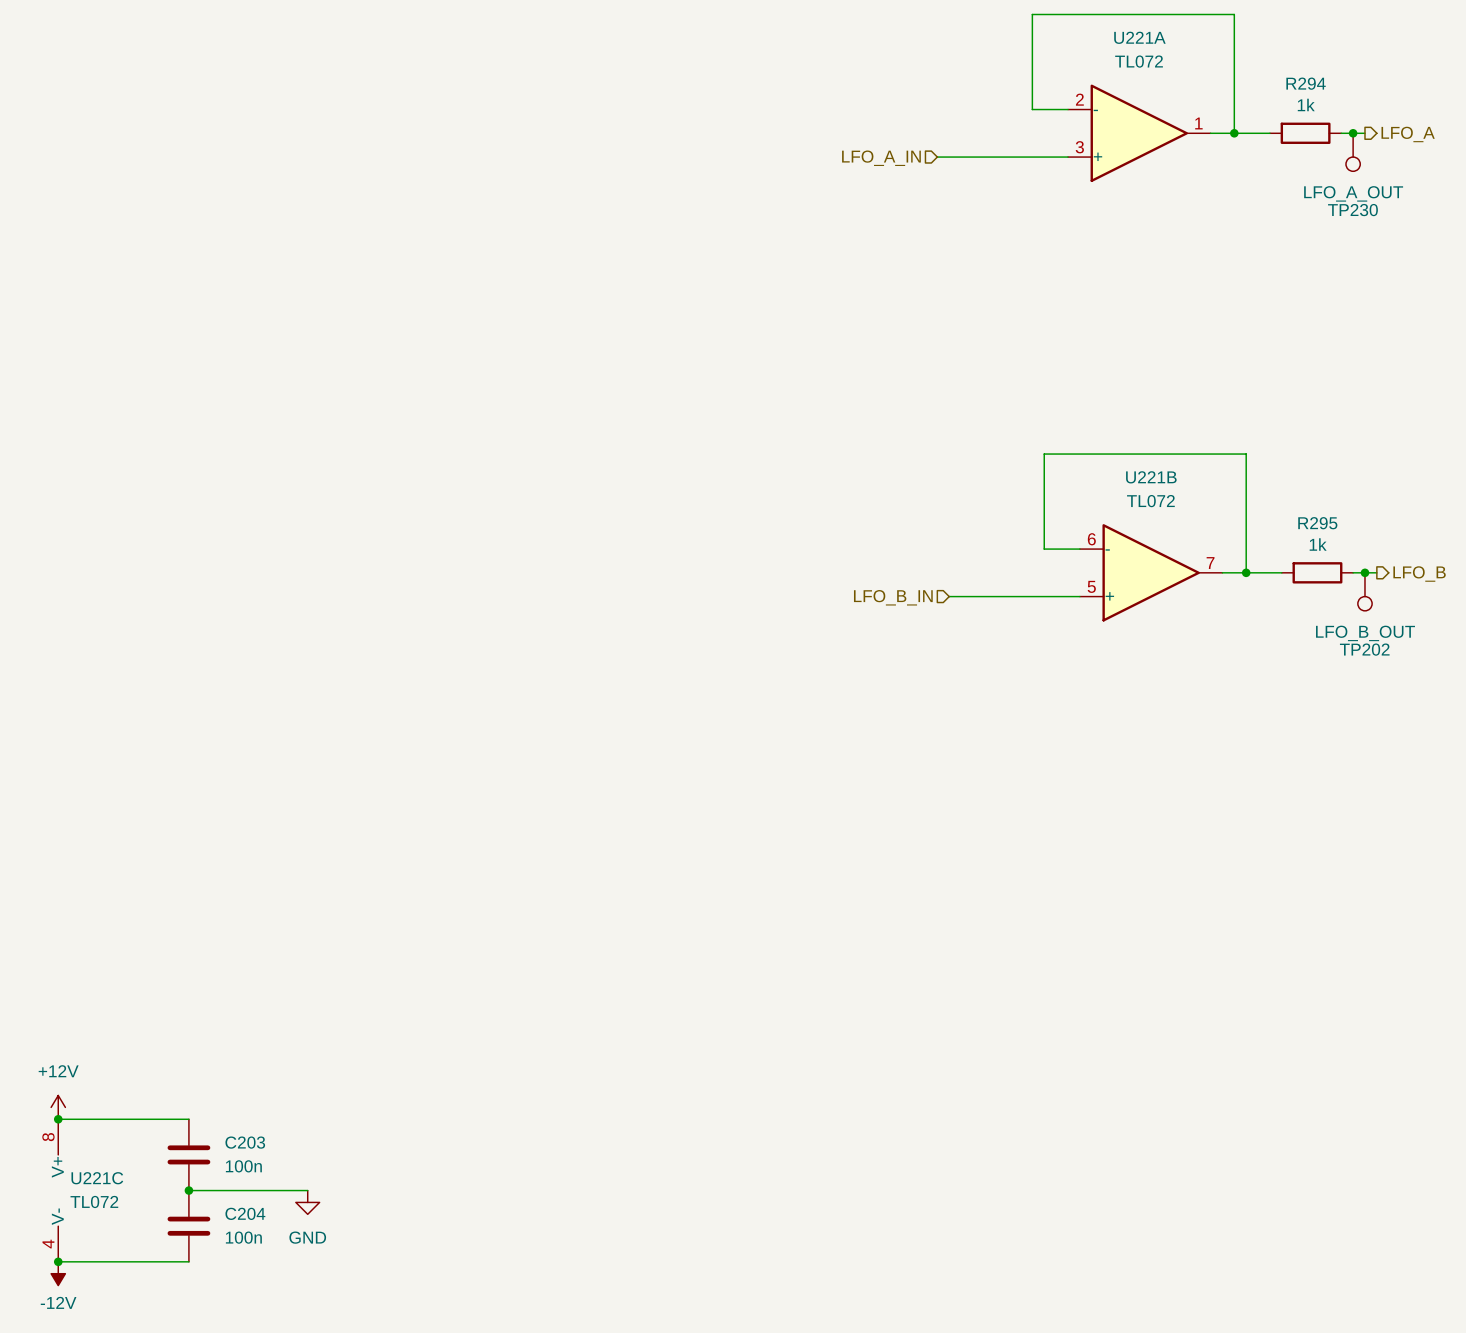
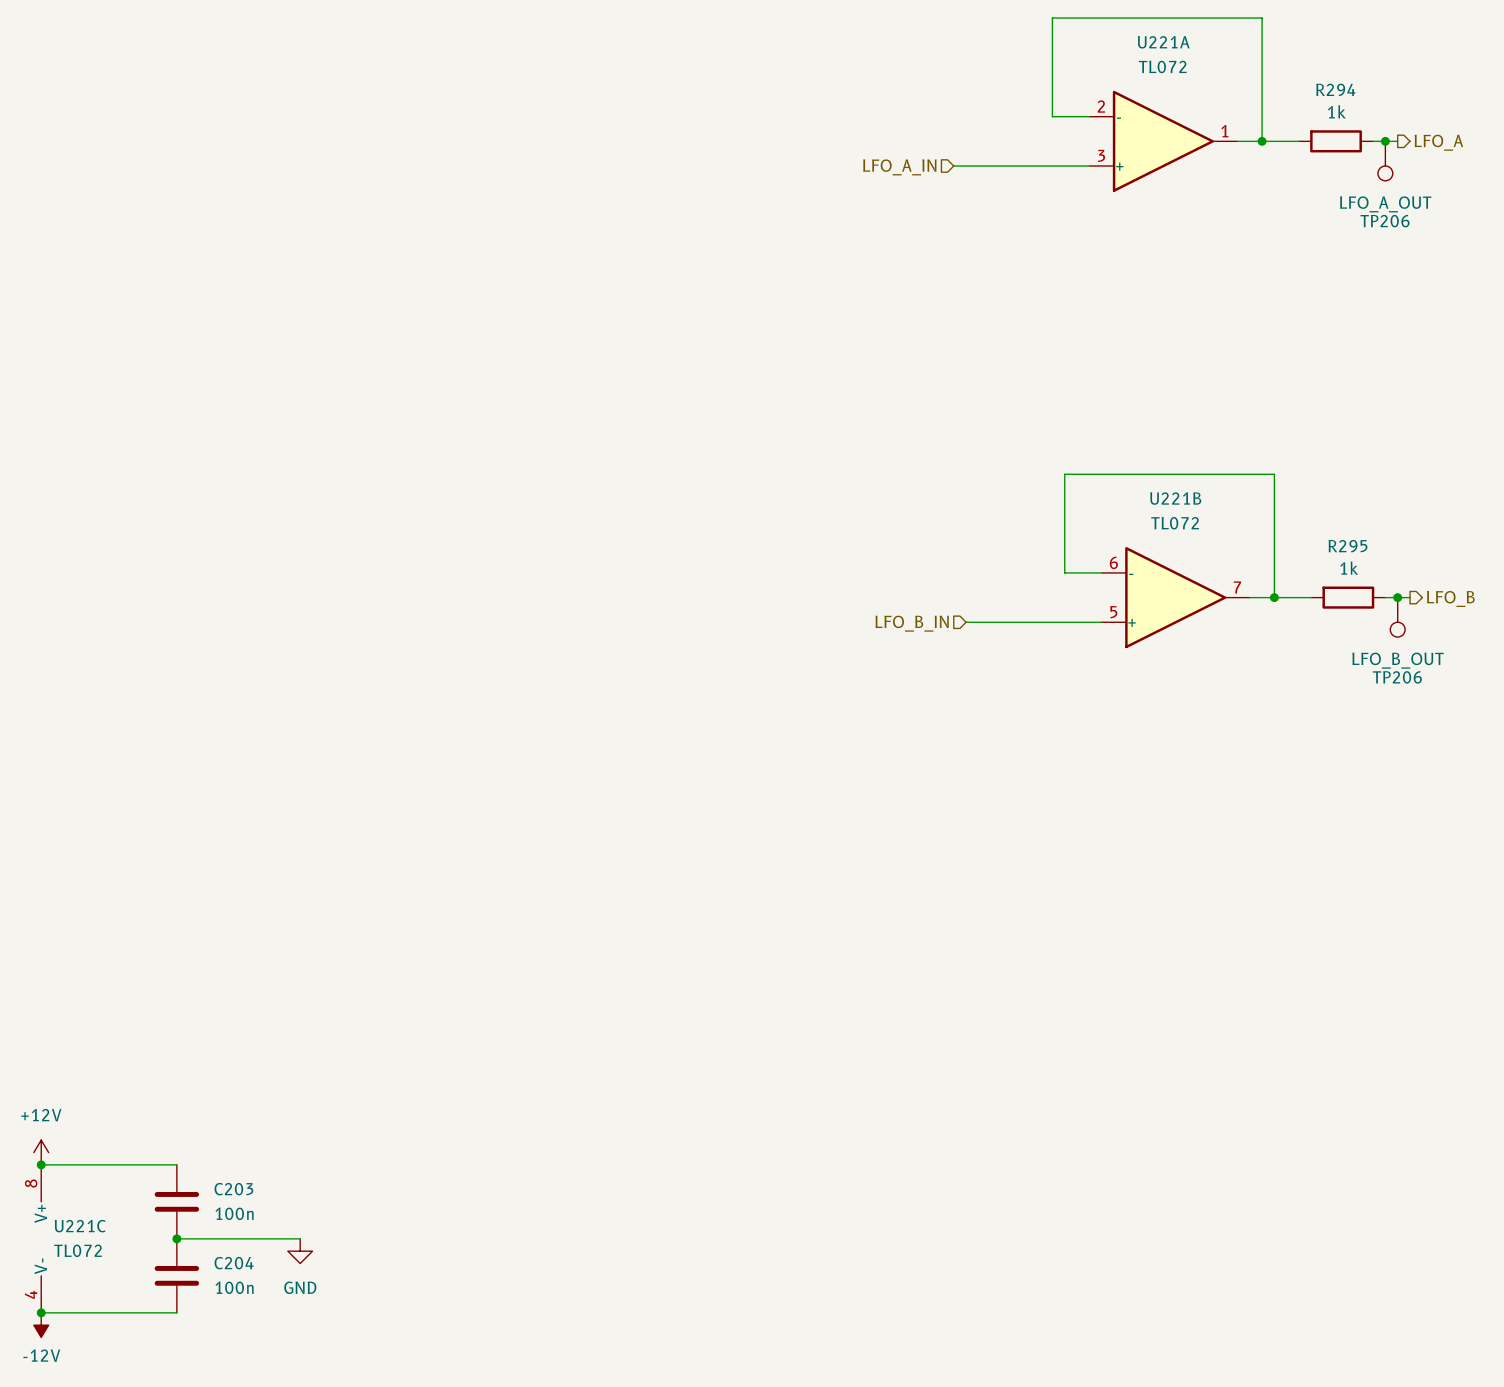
TP230 name: TP230 (1352, 210) -> TP206 (1384, 221)
TP202 name: TP202 (1364, 649) -> TP206 (1397, 677)

